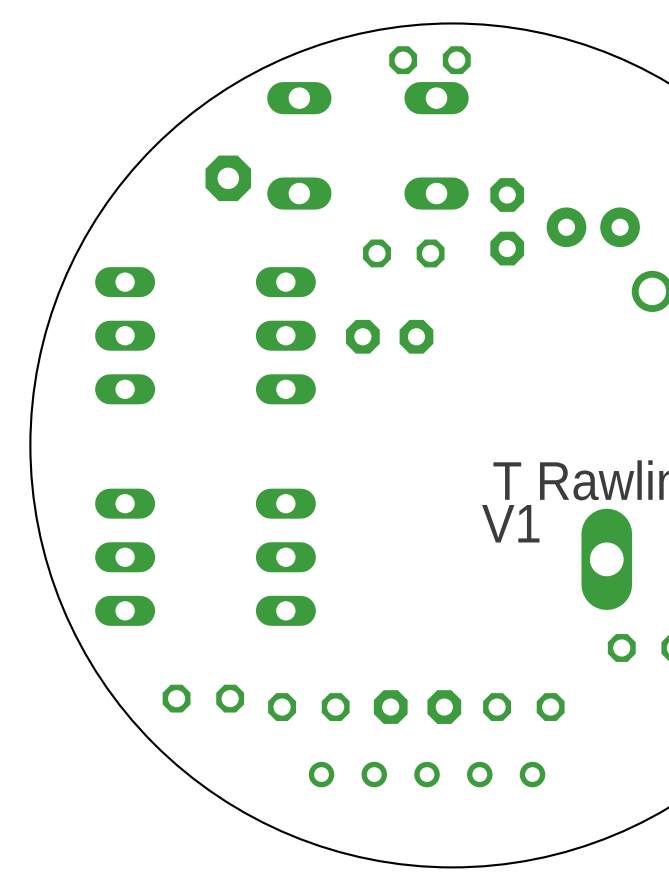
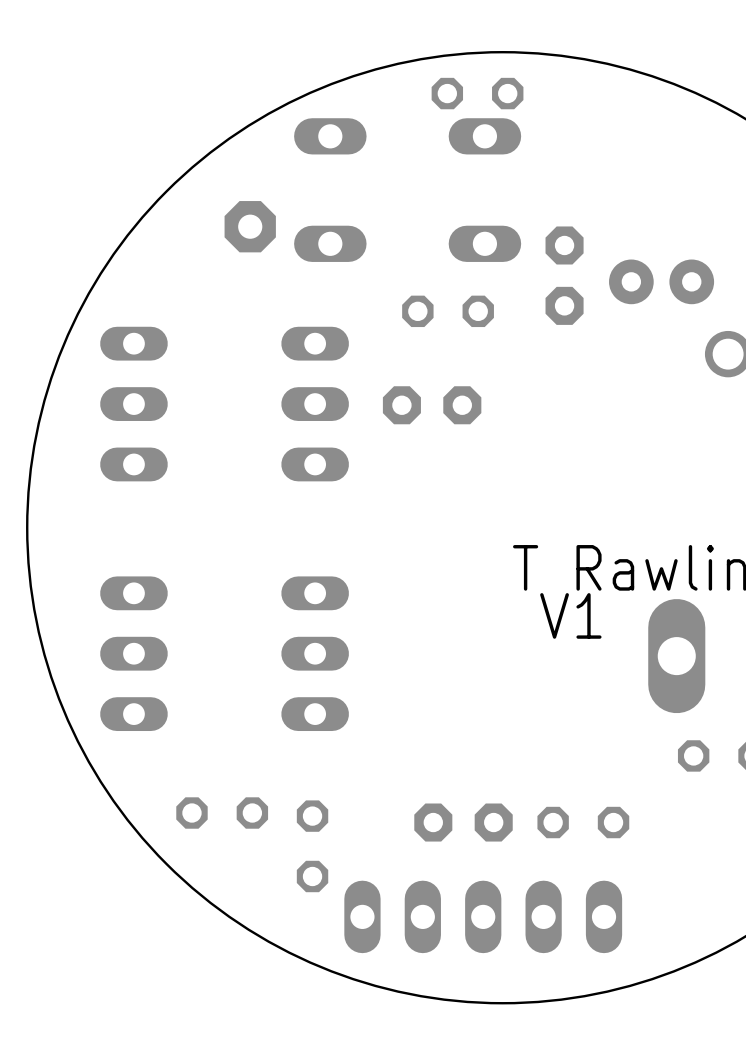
part rotation: 0° (308, 707) -> 90° clockwise (312, 846)
part footprint: [308, 761, 546, 788] -> [344, 880, 623, 954]

